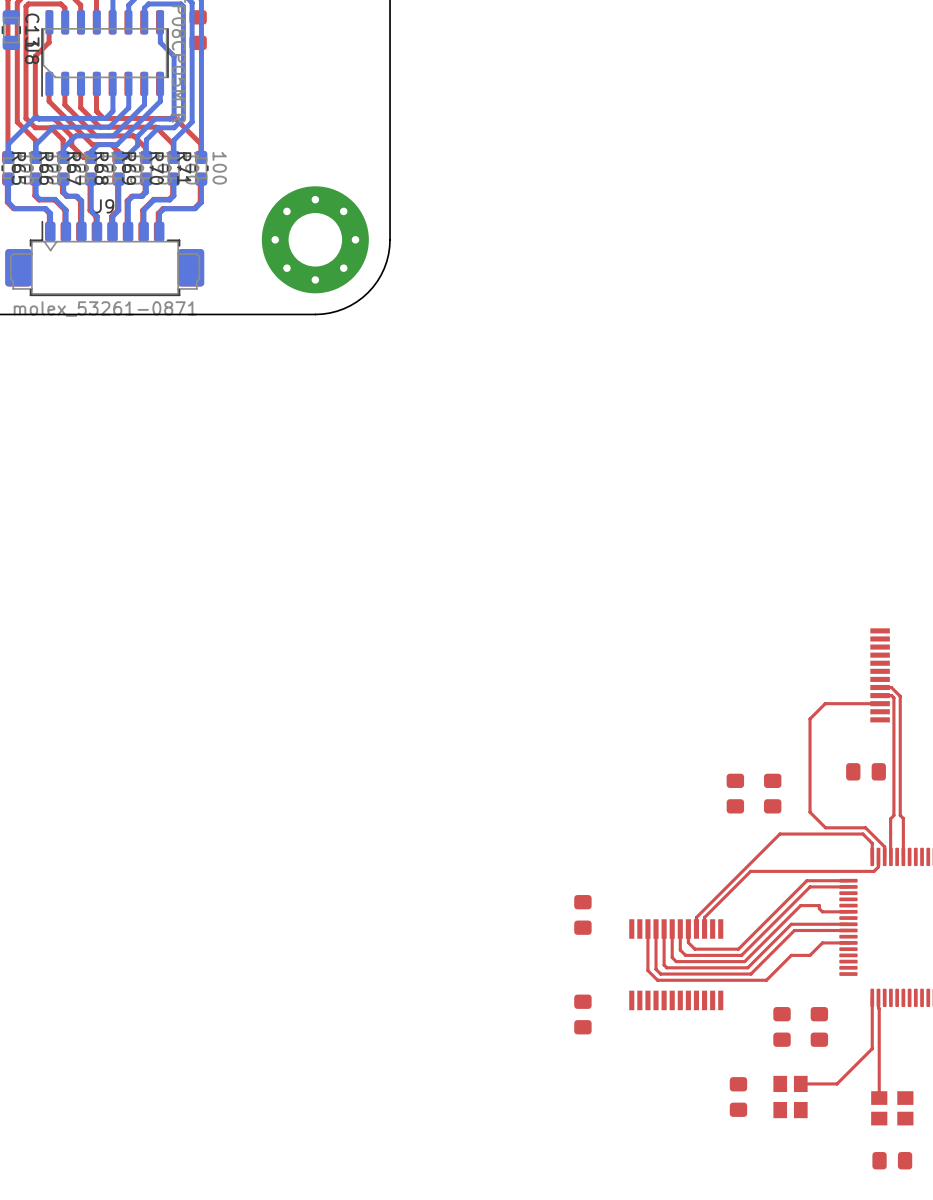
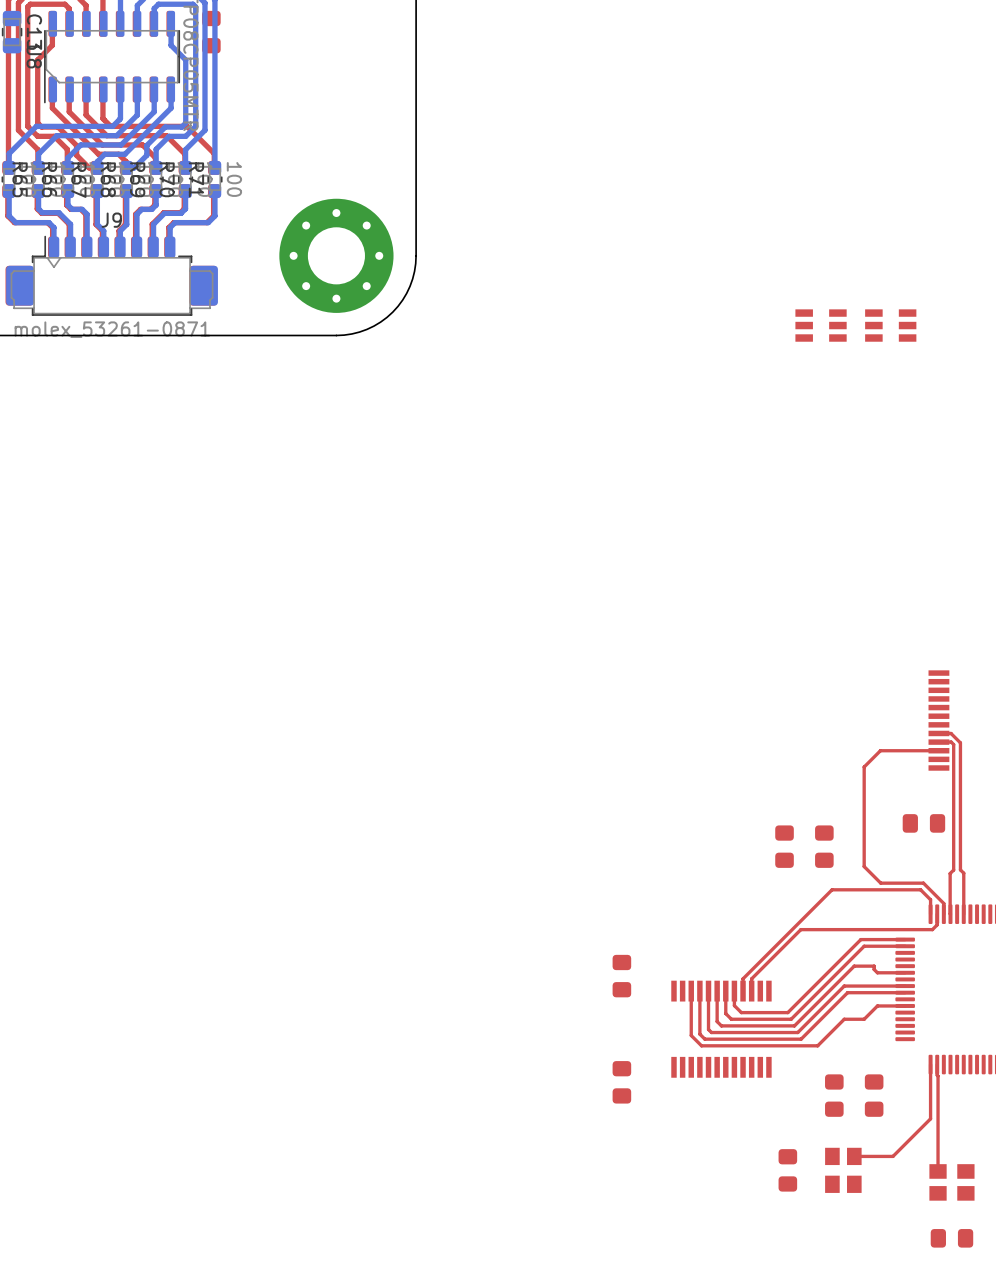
part: none -> (821, 325)
part: none -> (890, 325)

